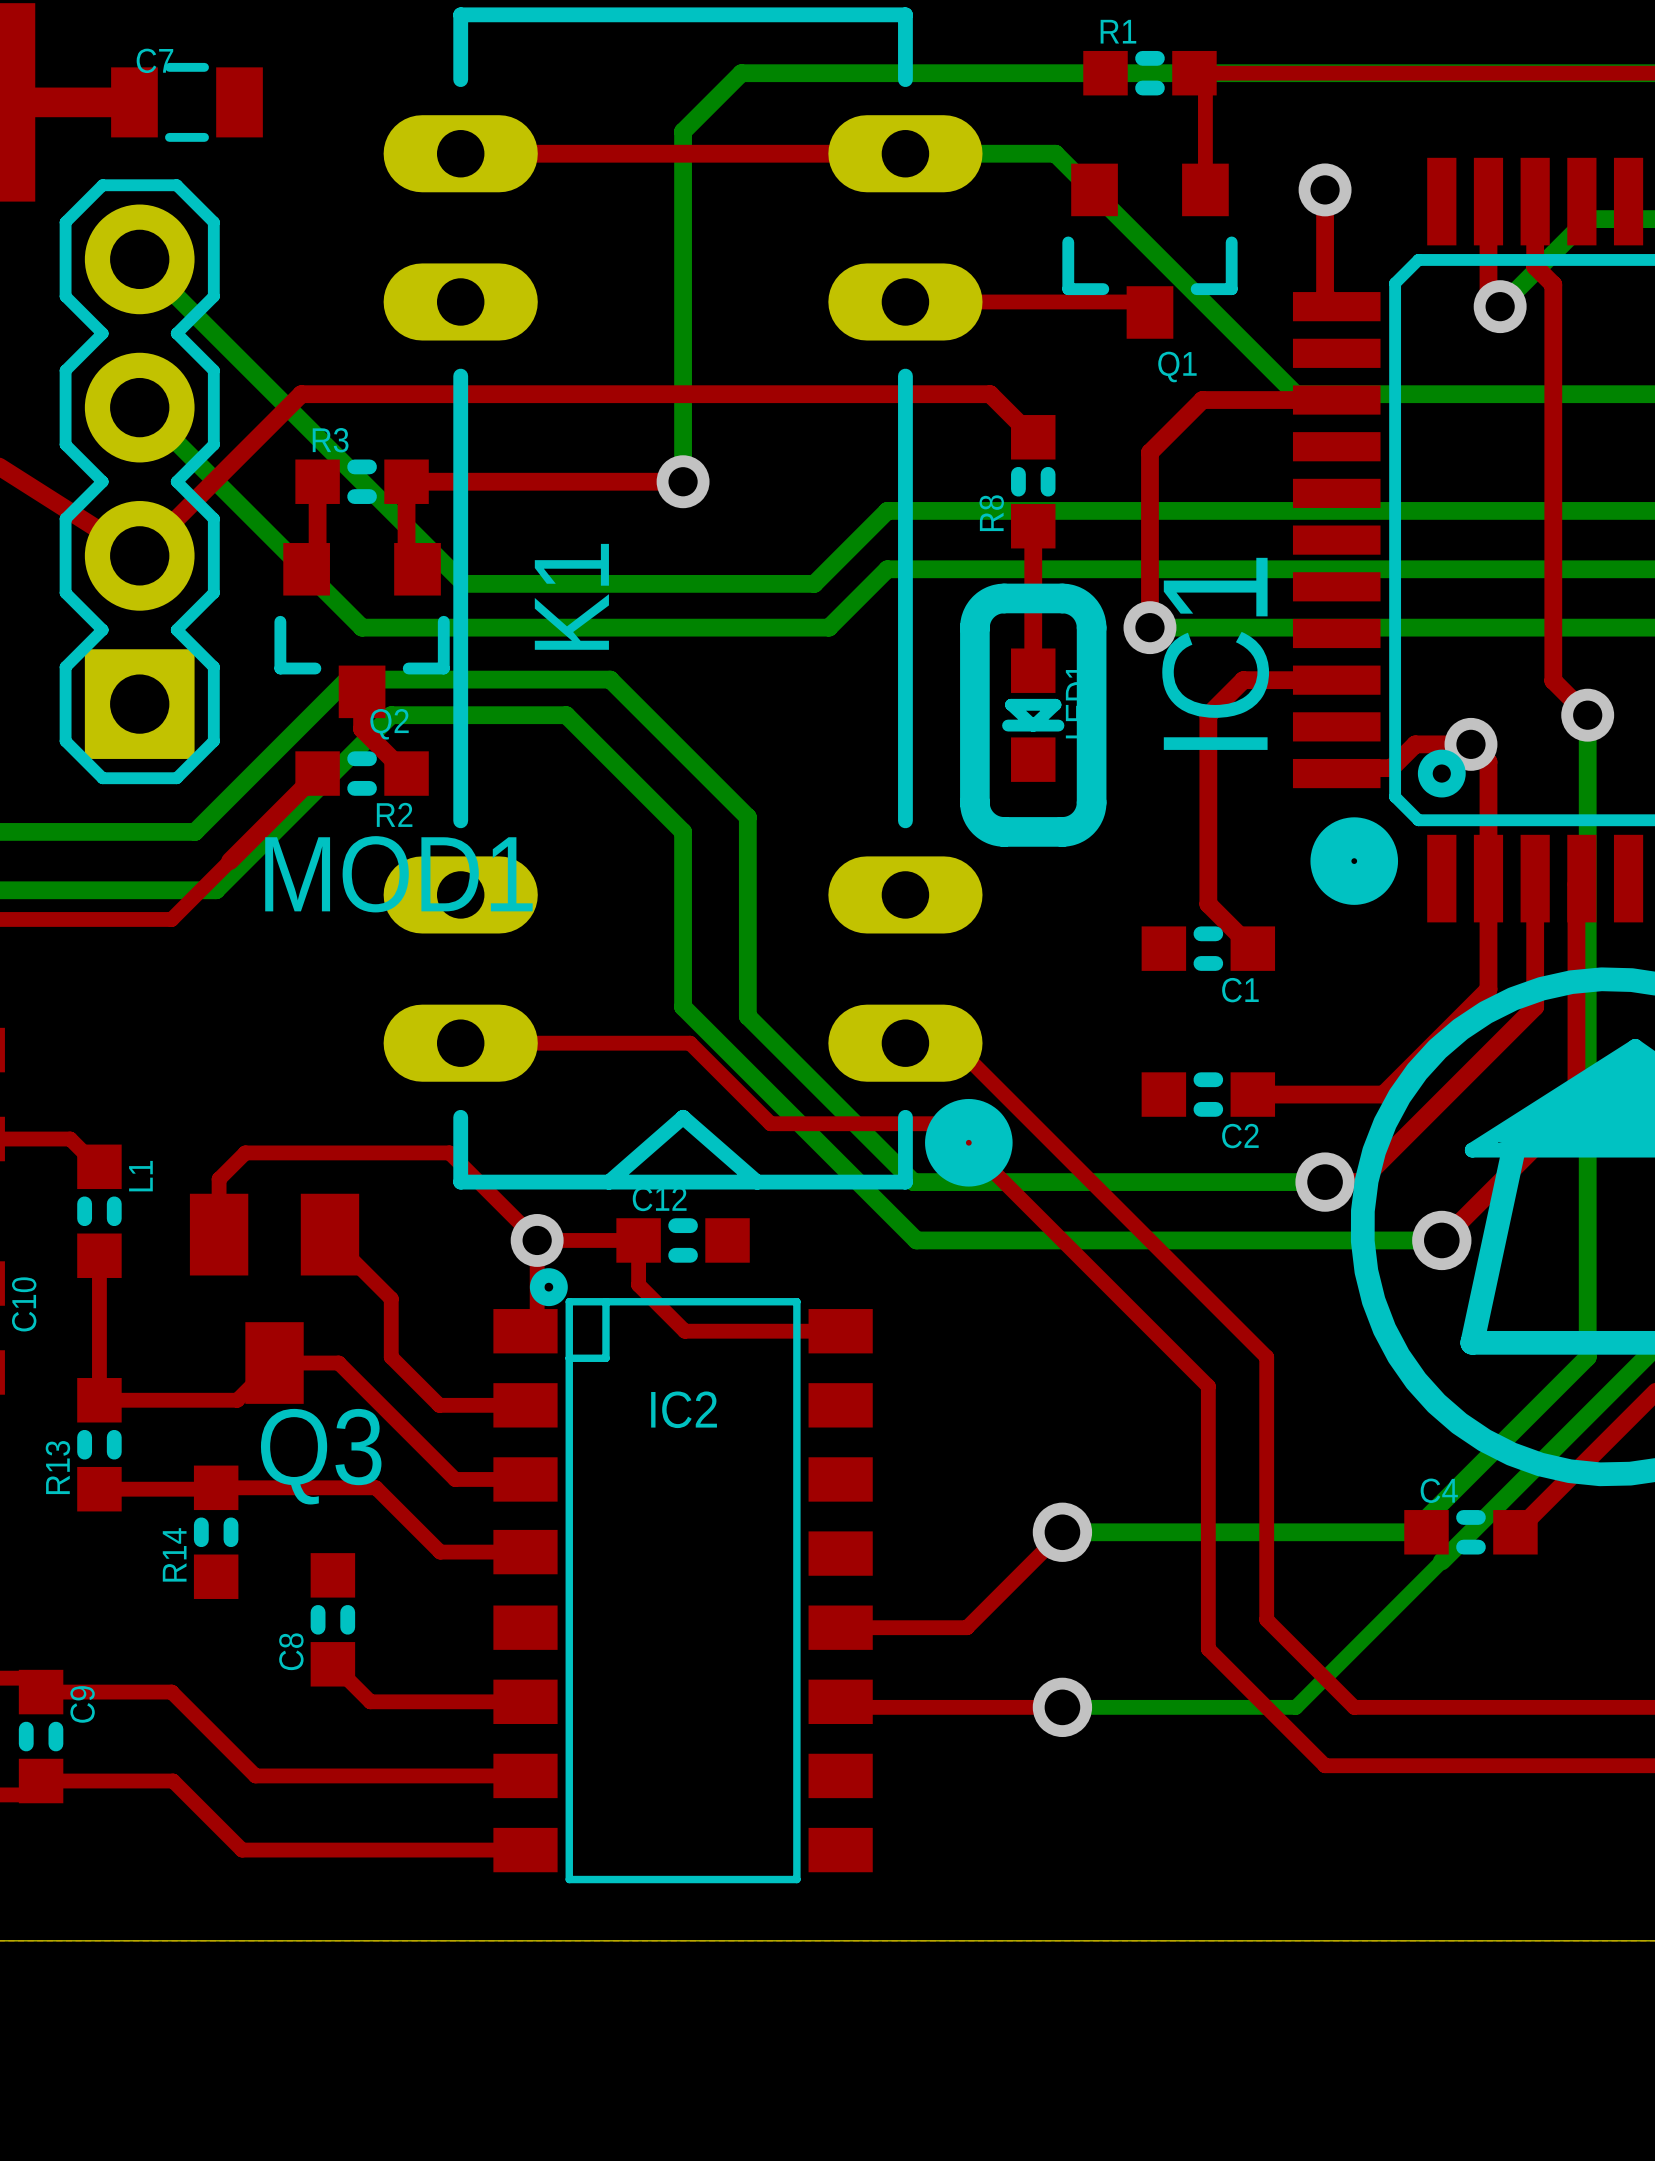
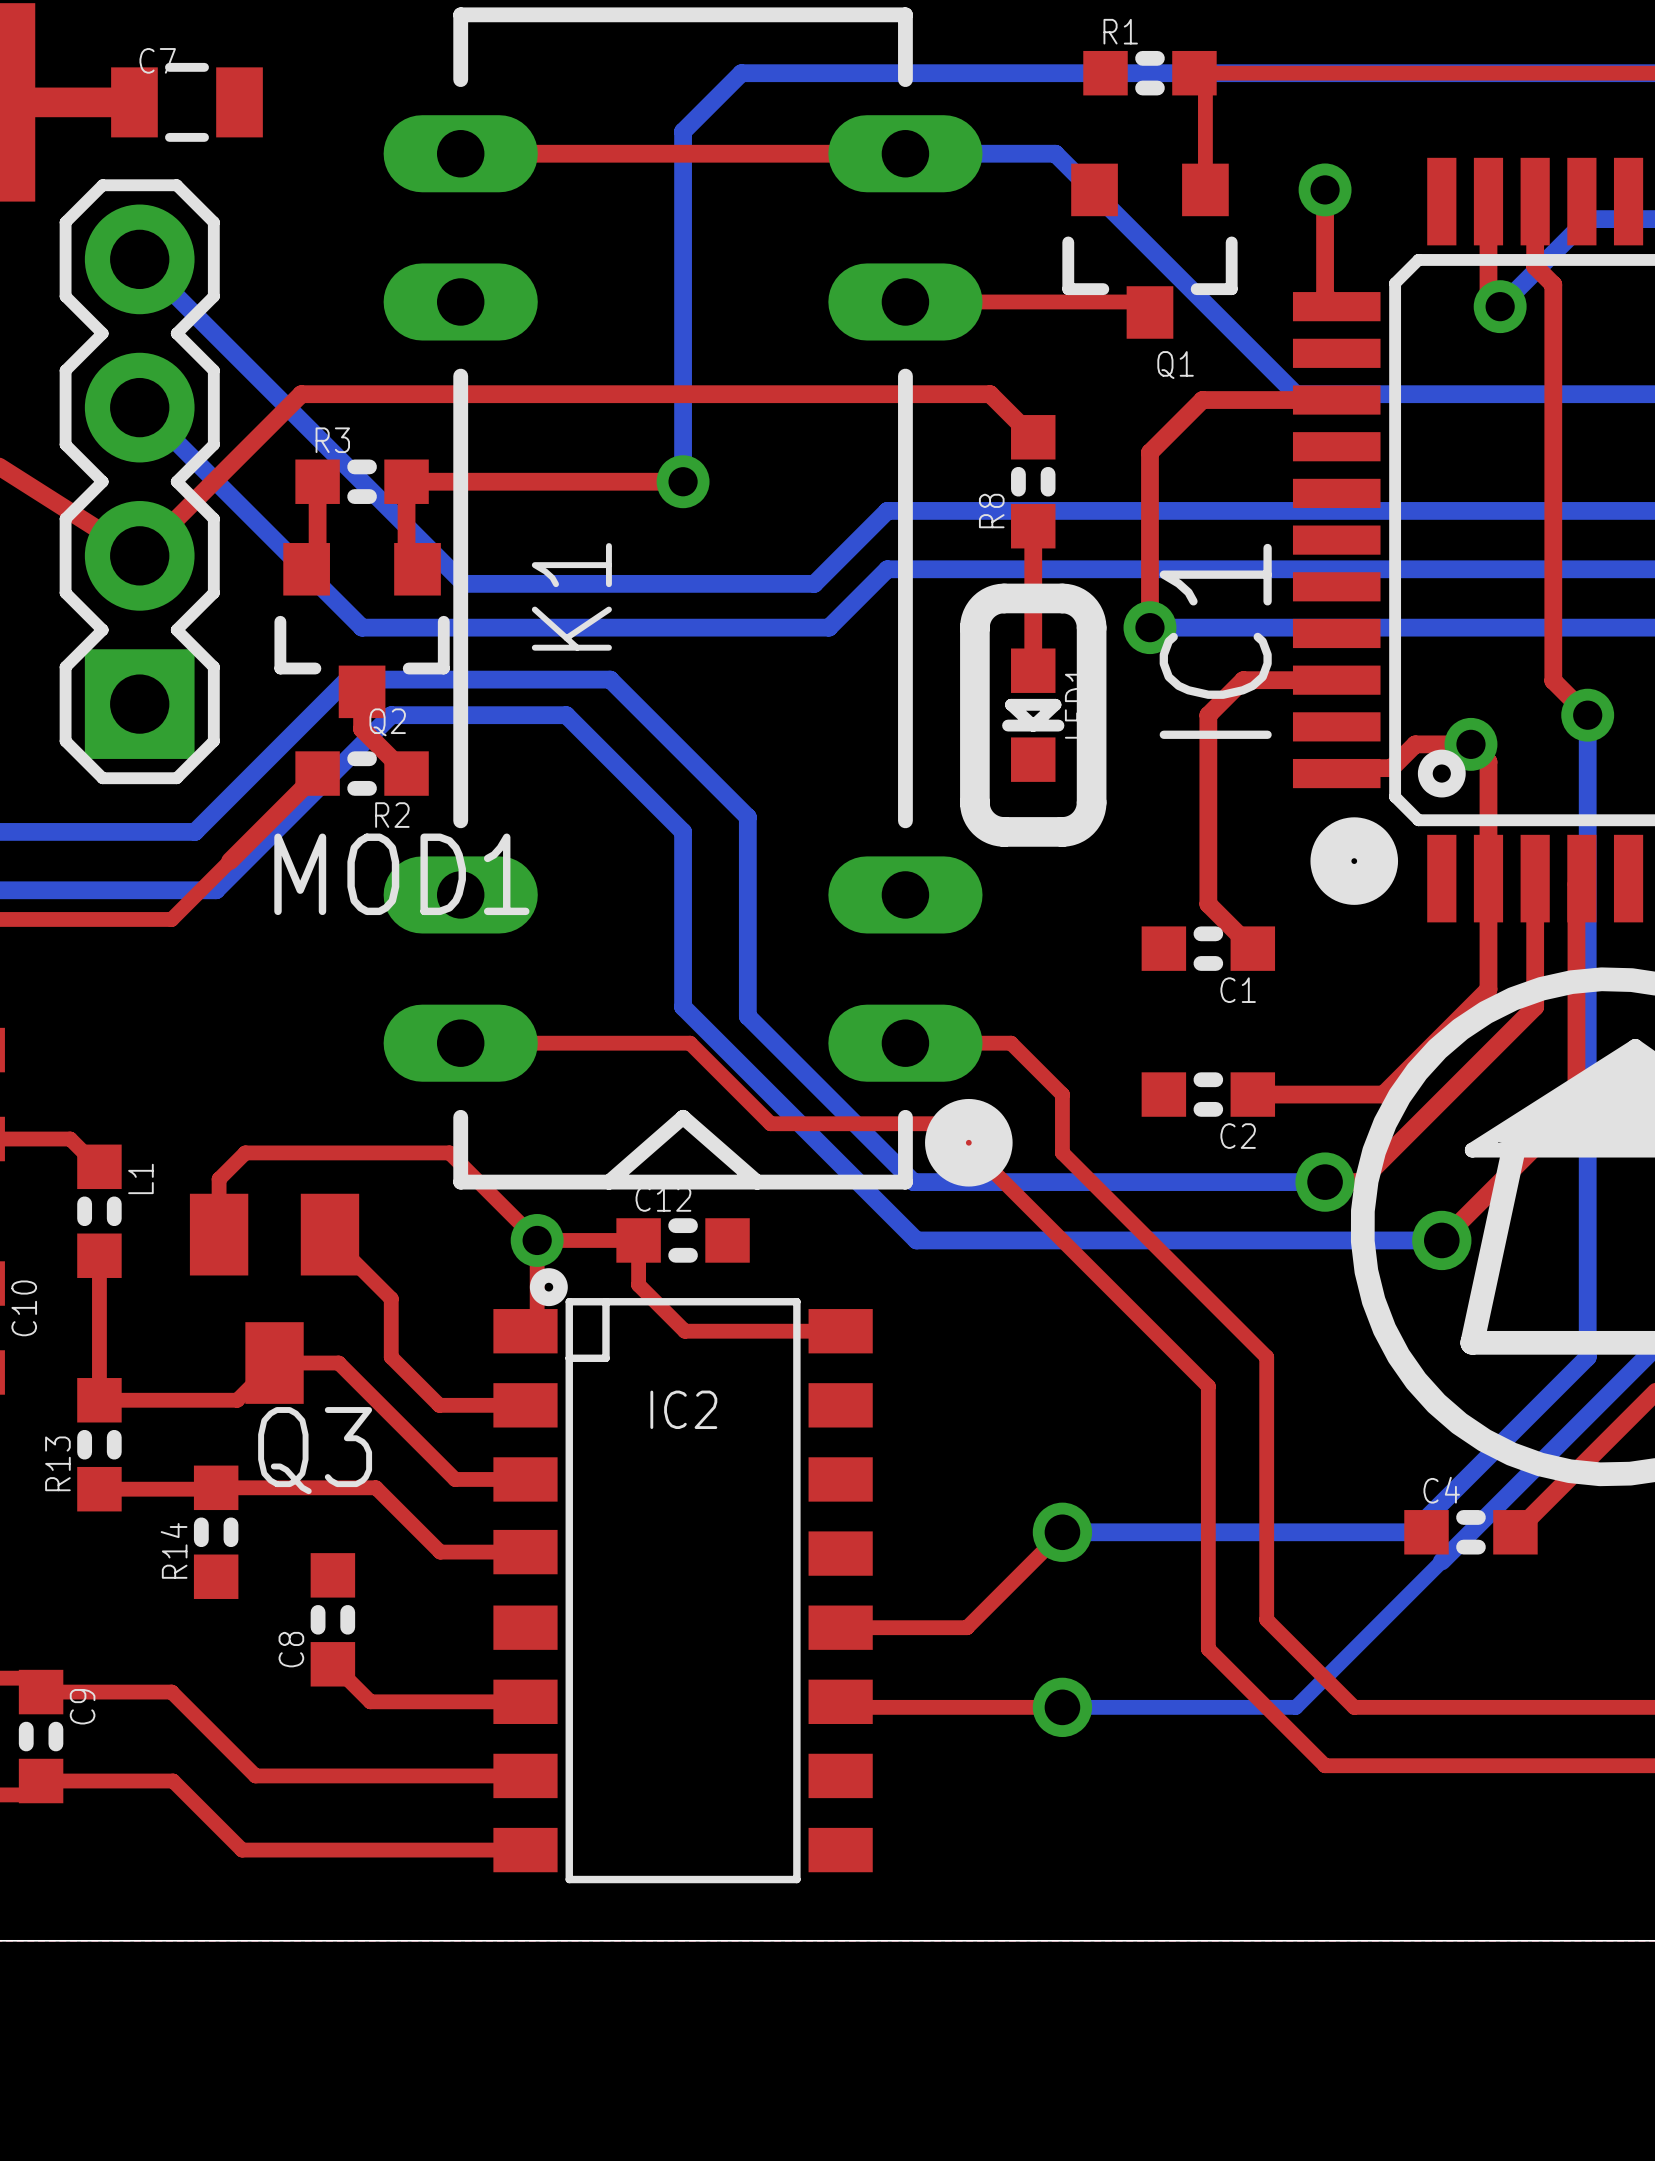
top track: (952, 1043) (1062, 1152) -> (952, 1043) (1011, 1043) (1062, 1094) (1062, 1152)

